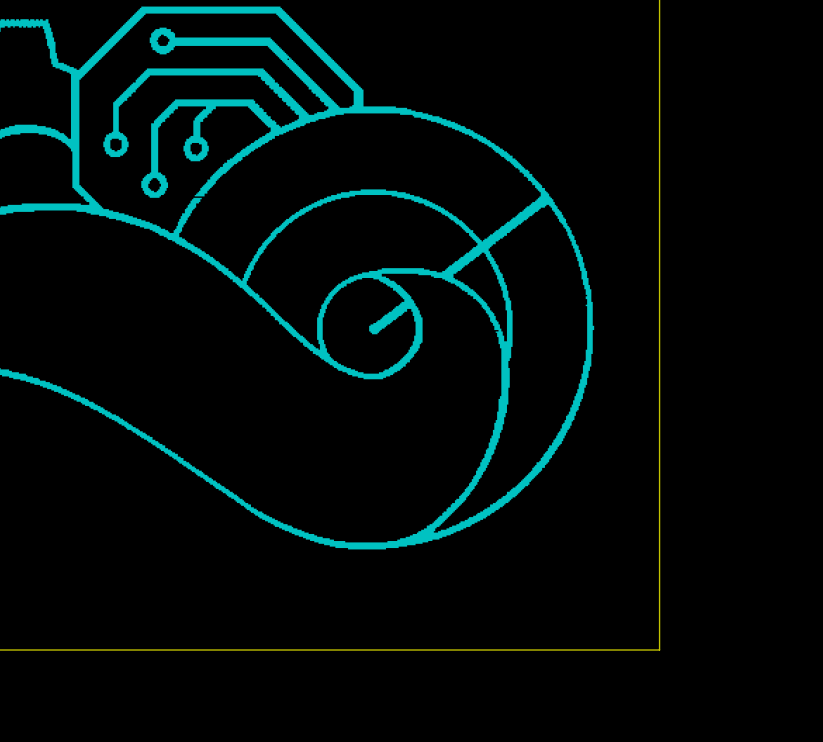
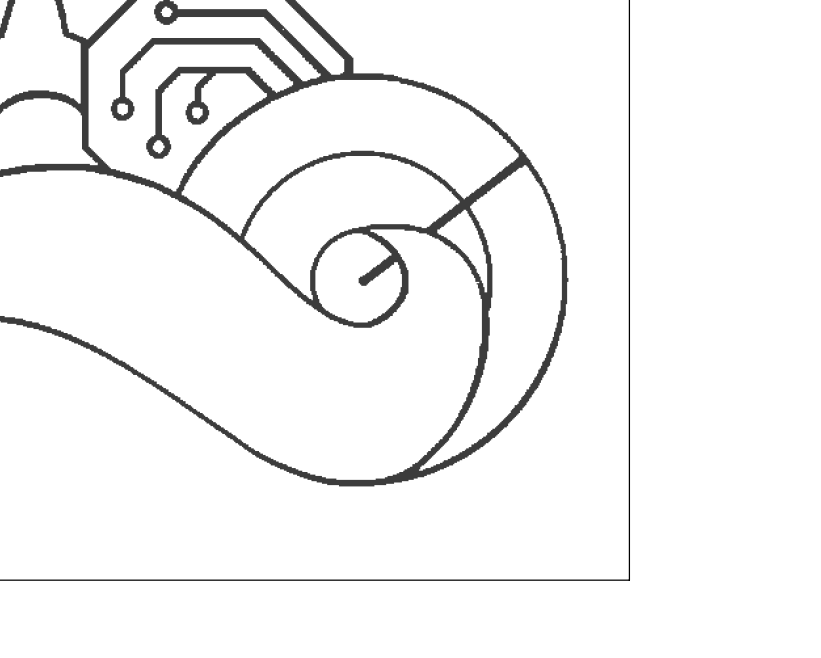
drawing: none -> [194, 157, 204, 159]

